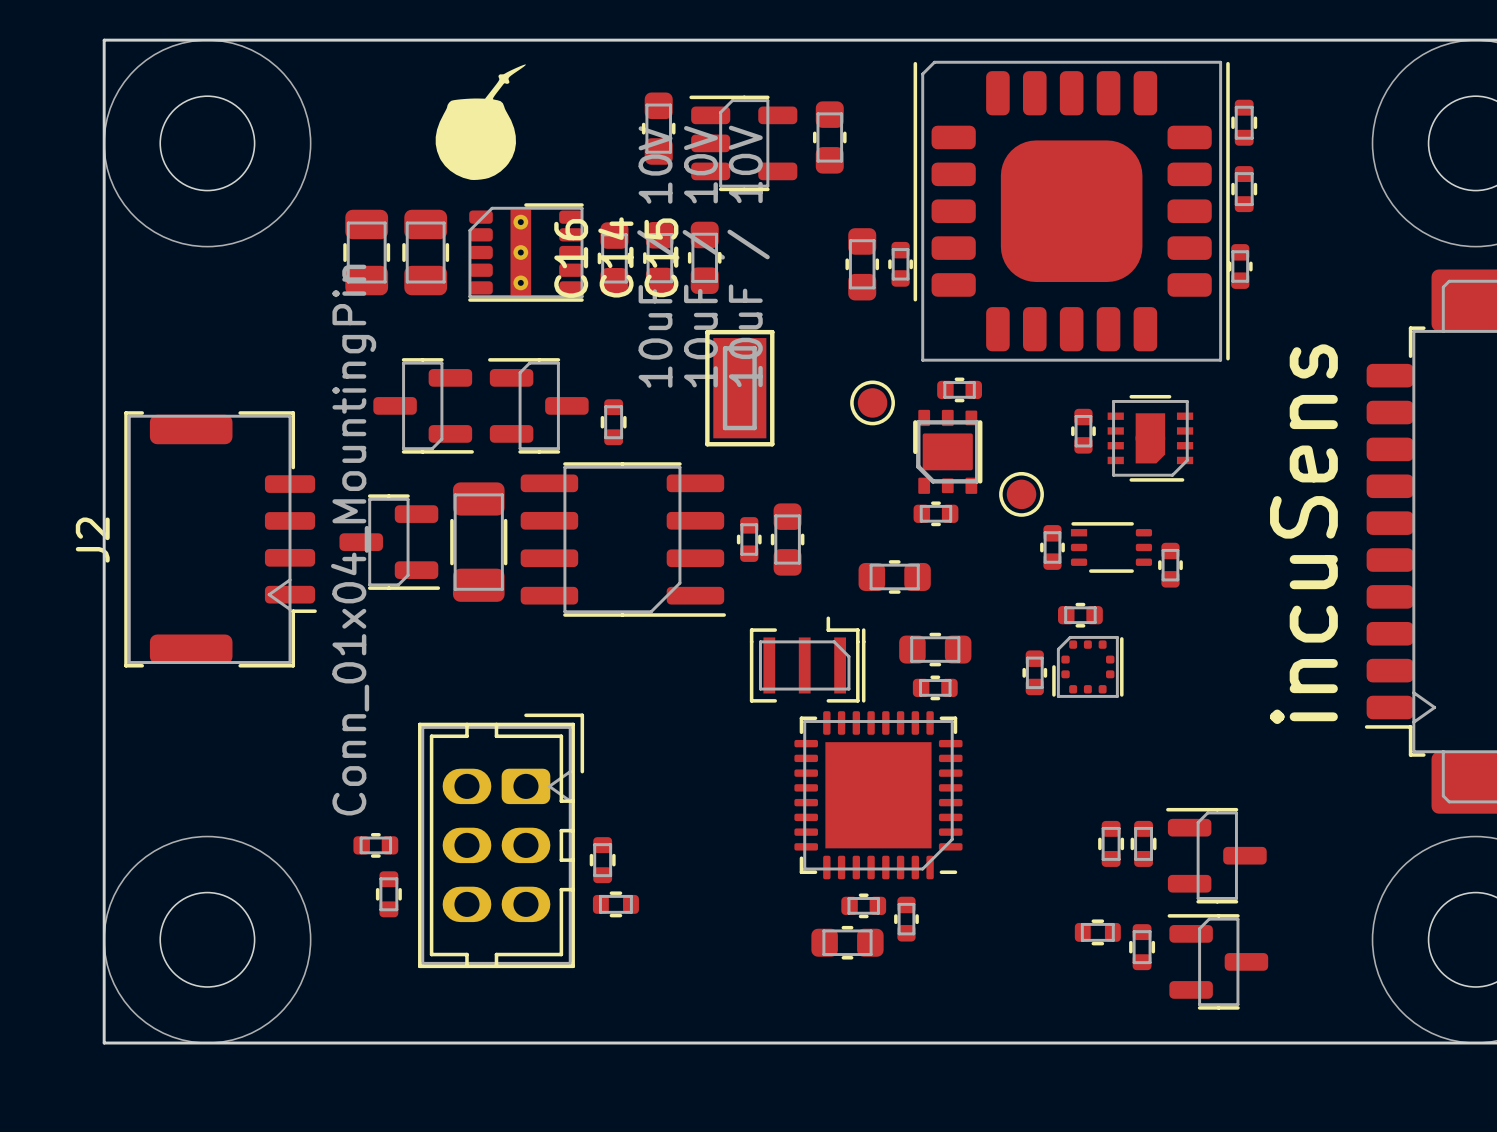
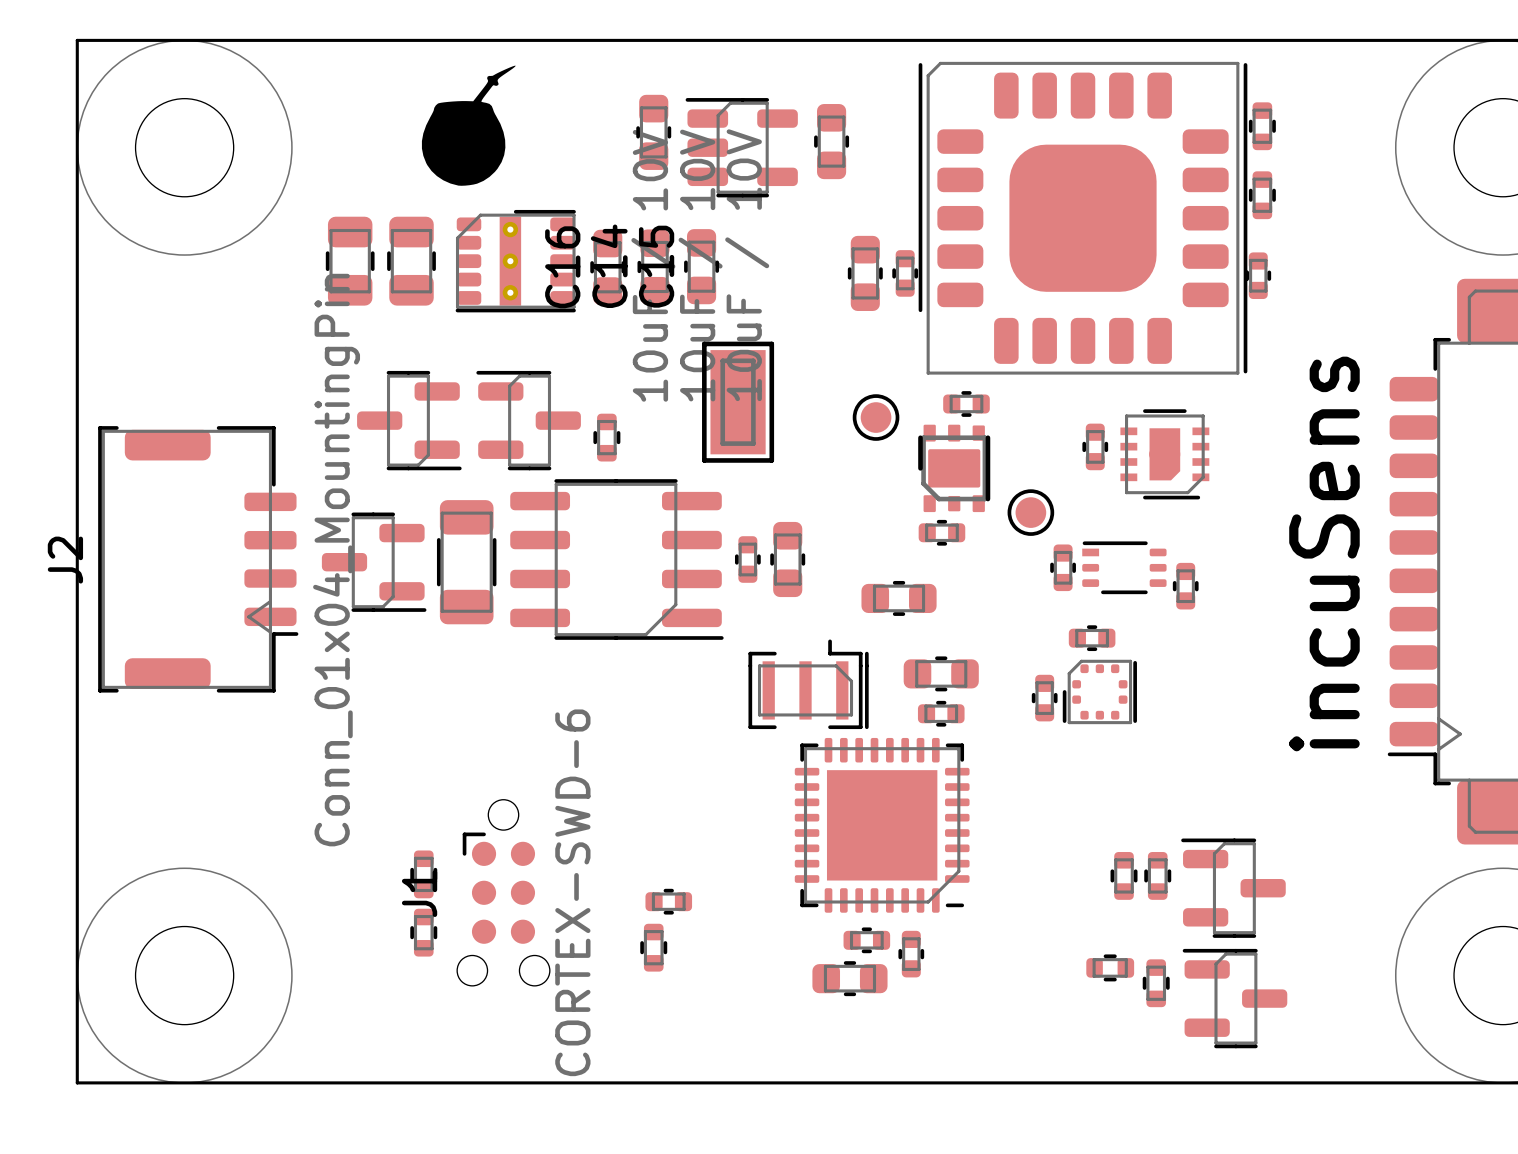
part: (501, 840) -> none
part: none -> (423, 874)
part position: (375, 845) -> (668, 901)
J1: none -> CORTEX-SWD-6 (503, 892)
part: (602, 860) -> none
part: (388, 894) -> none
part: none -> (423, 932)
part: (615, 904) -> none
part: none -> (653, 947)

